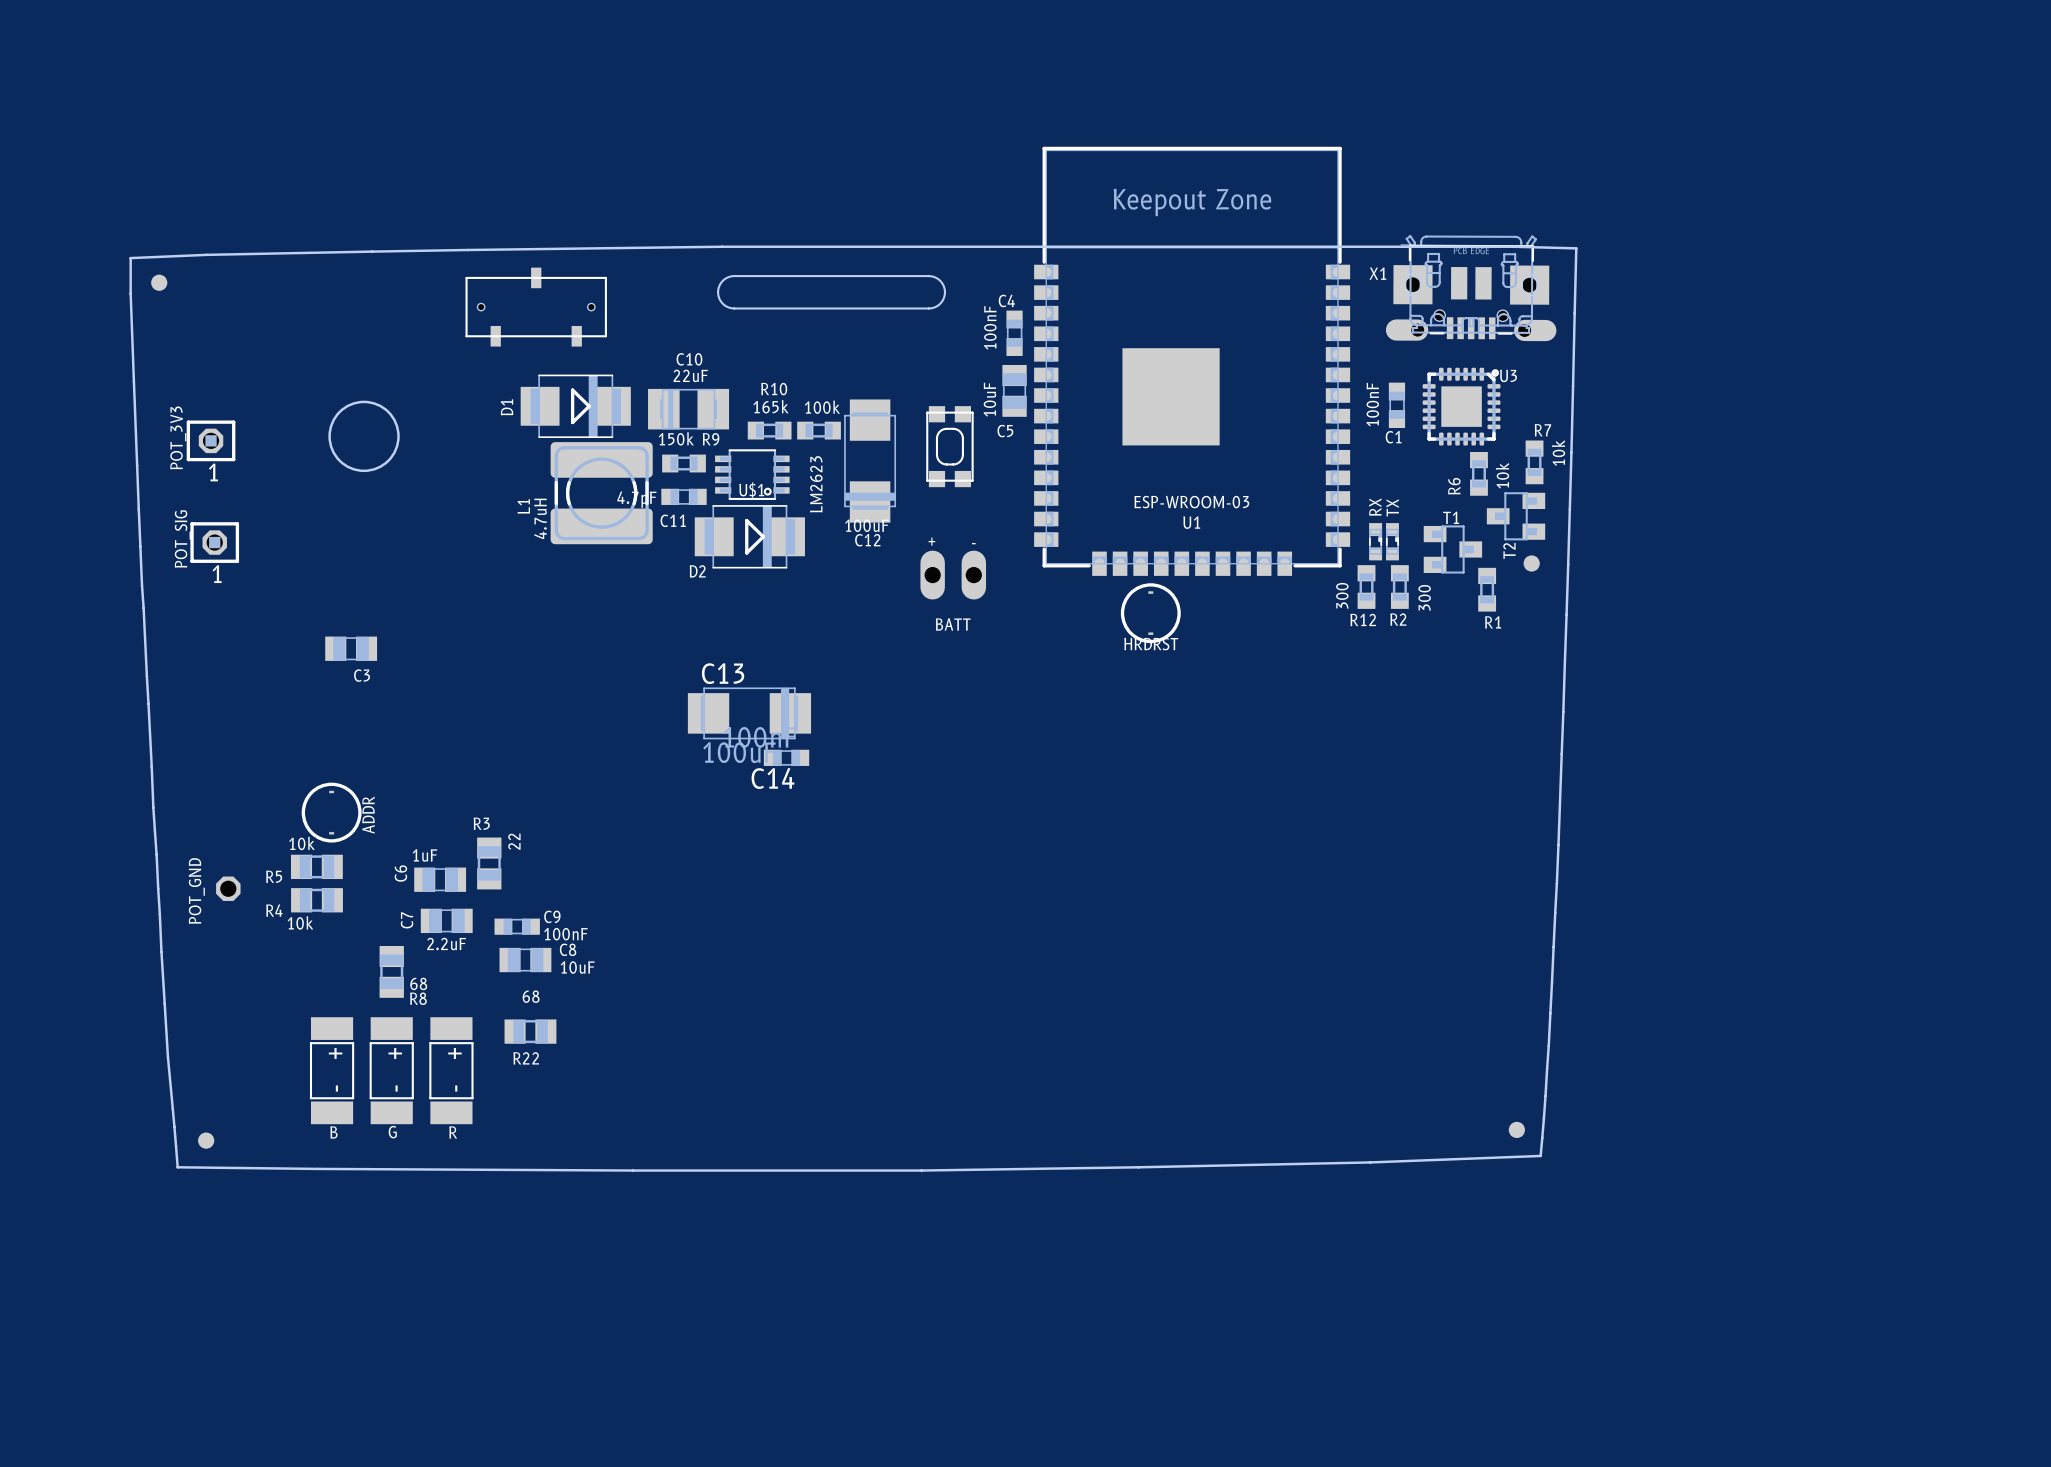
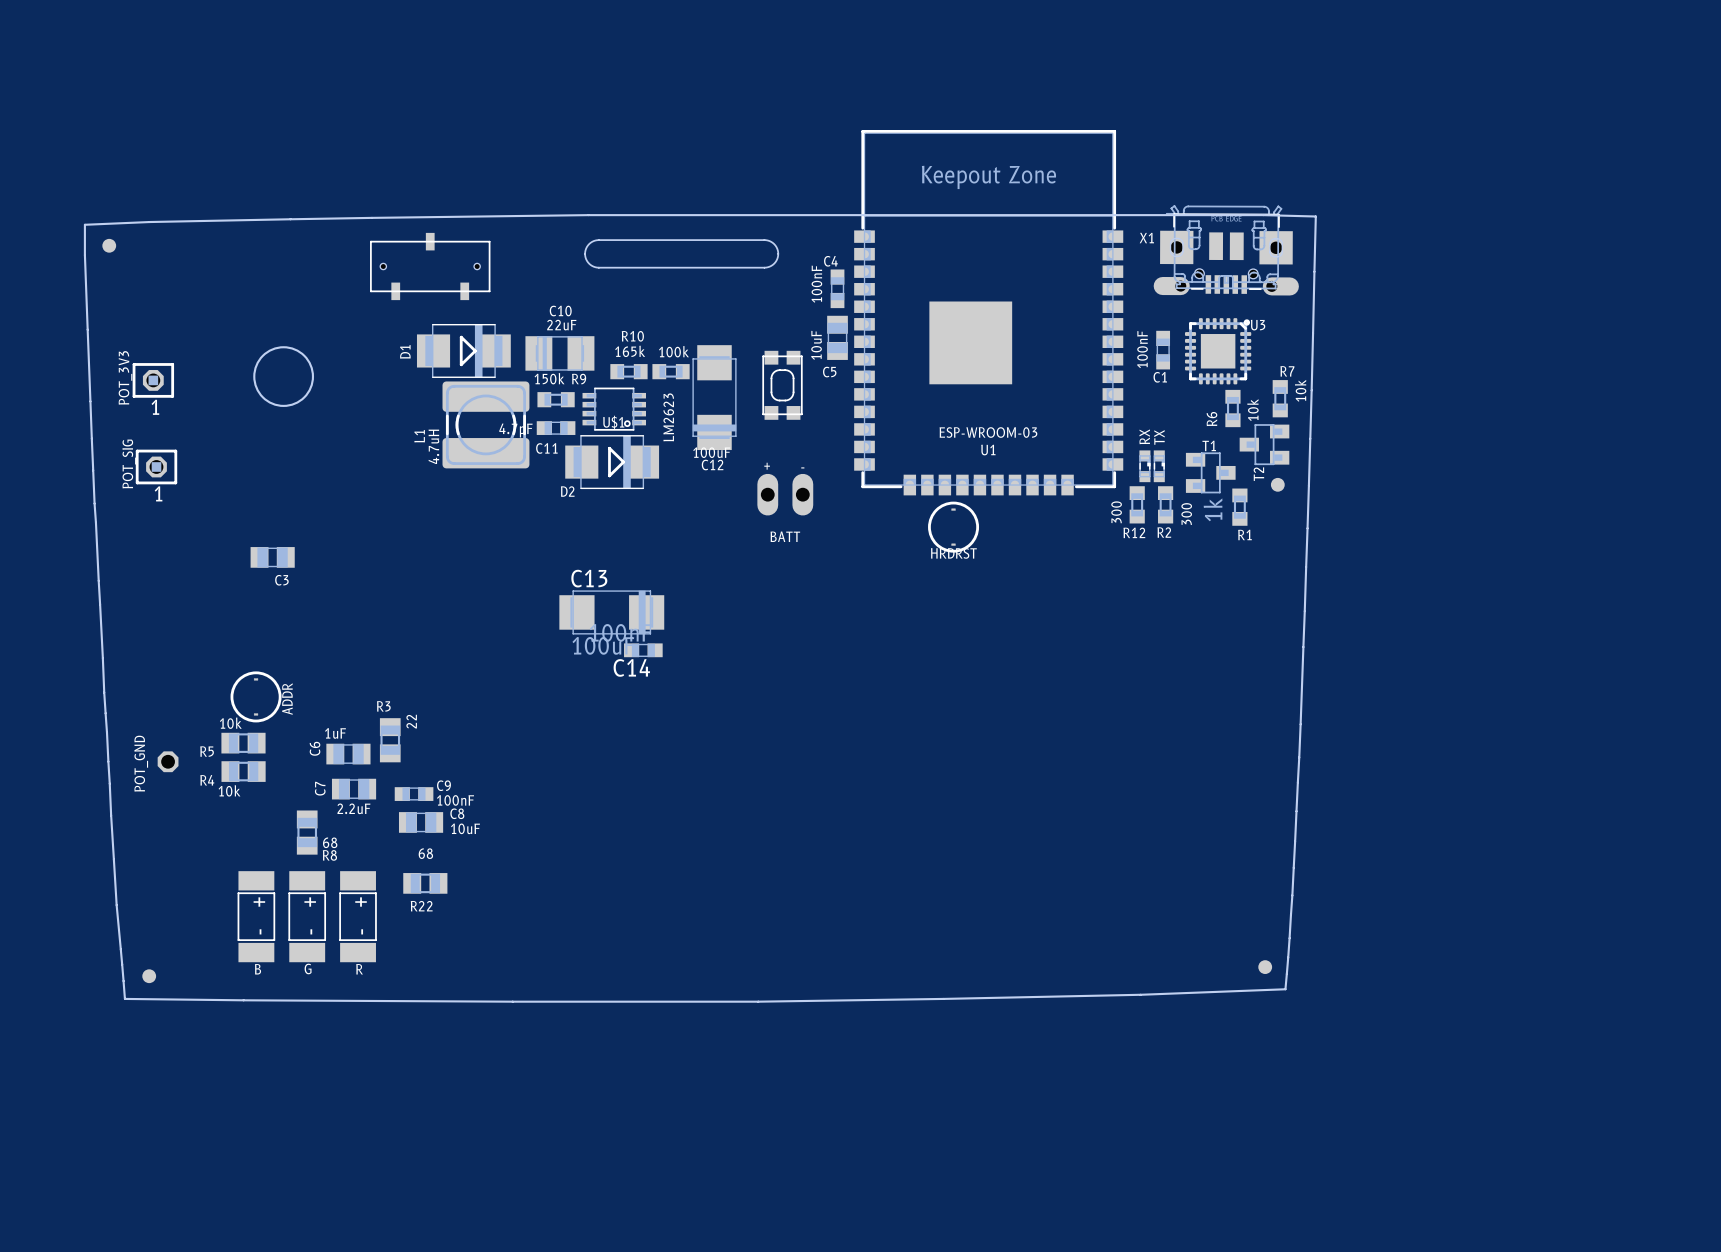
R1 value: none -> 1k (1213, 509)

